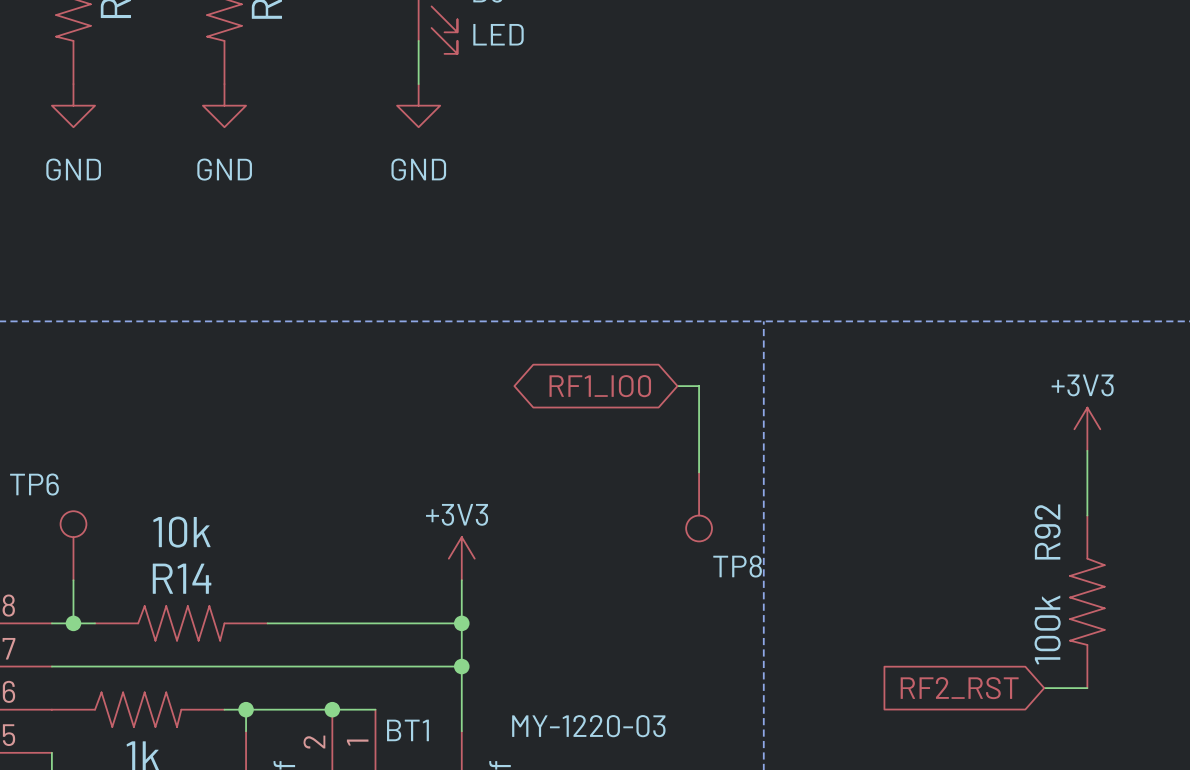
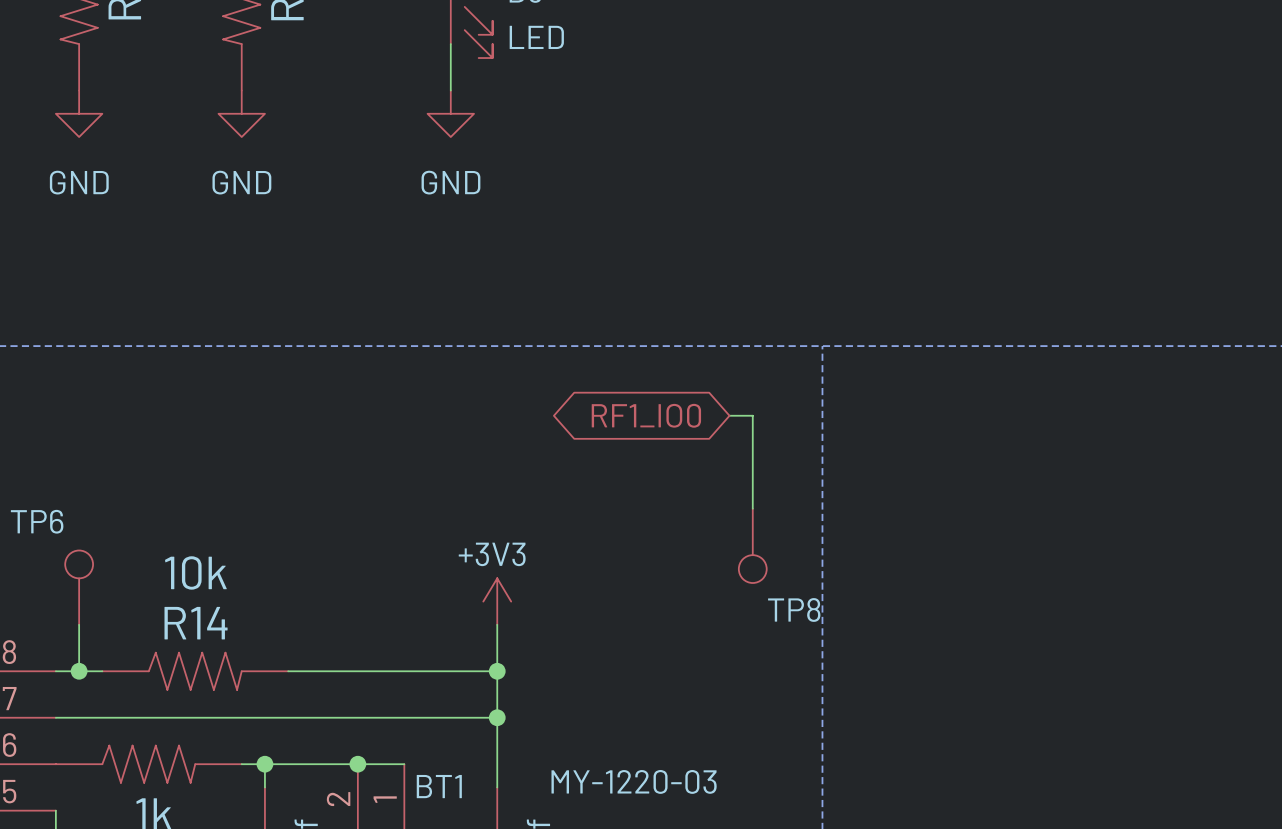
power symbol: +3V3 (1087, 429) -> none
wire: (1087, 450) (1087, 515) -> none
R92: 100k (1087, 601) -> none
global label: RF2_RST (959, 688) -> none
wire: (1044, 688) (1087, 688) -> none

